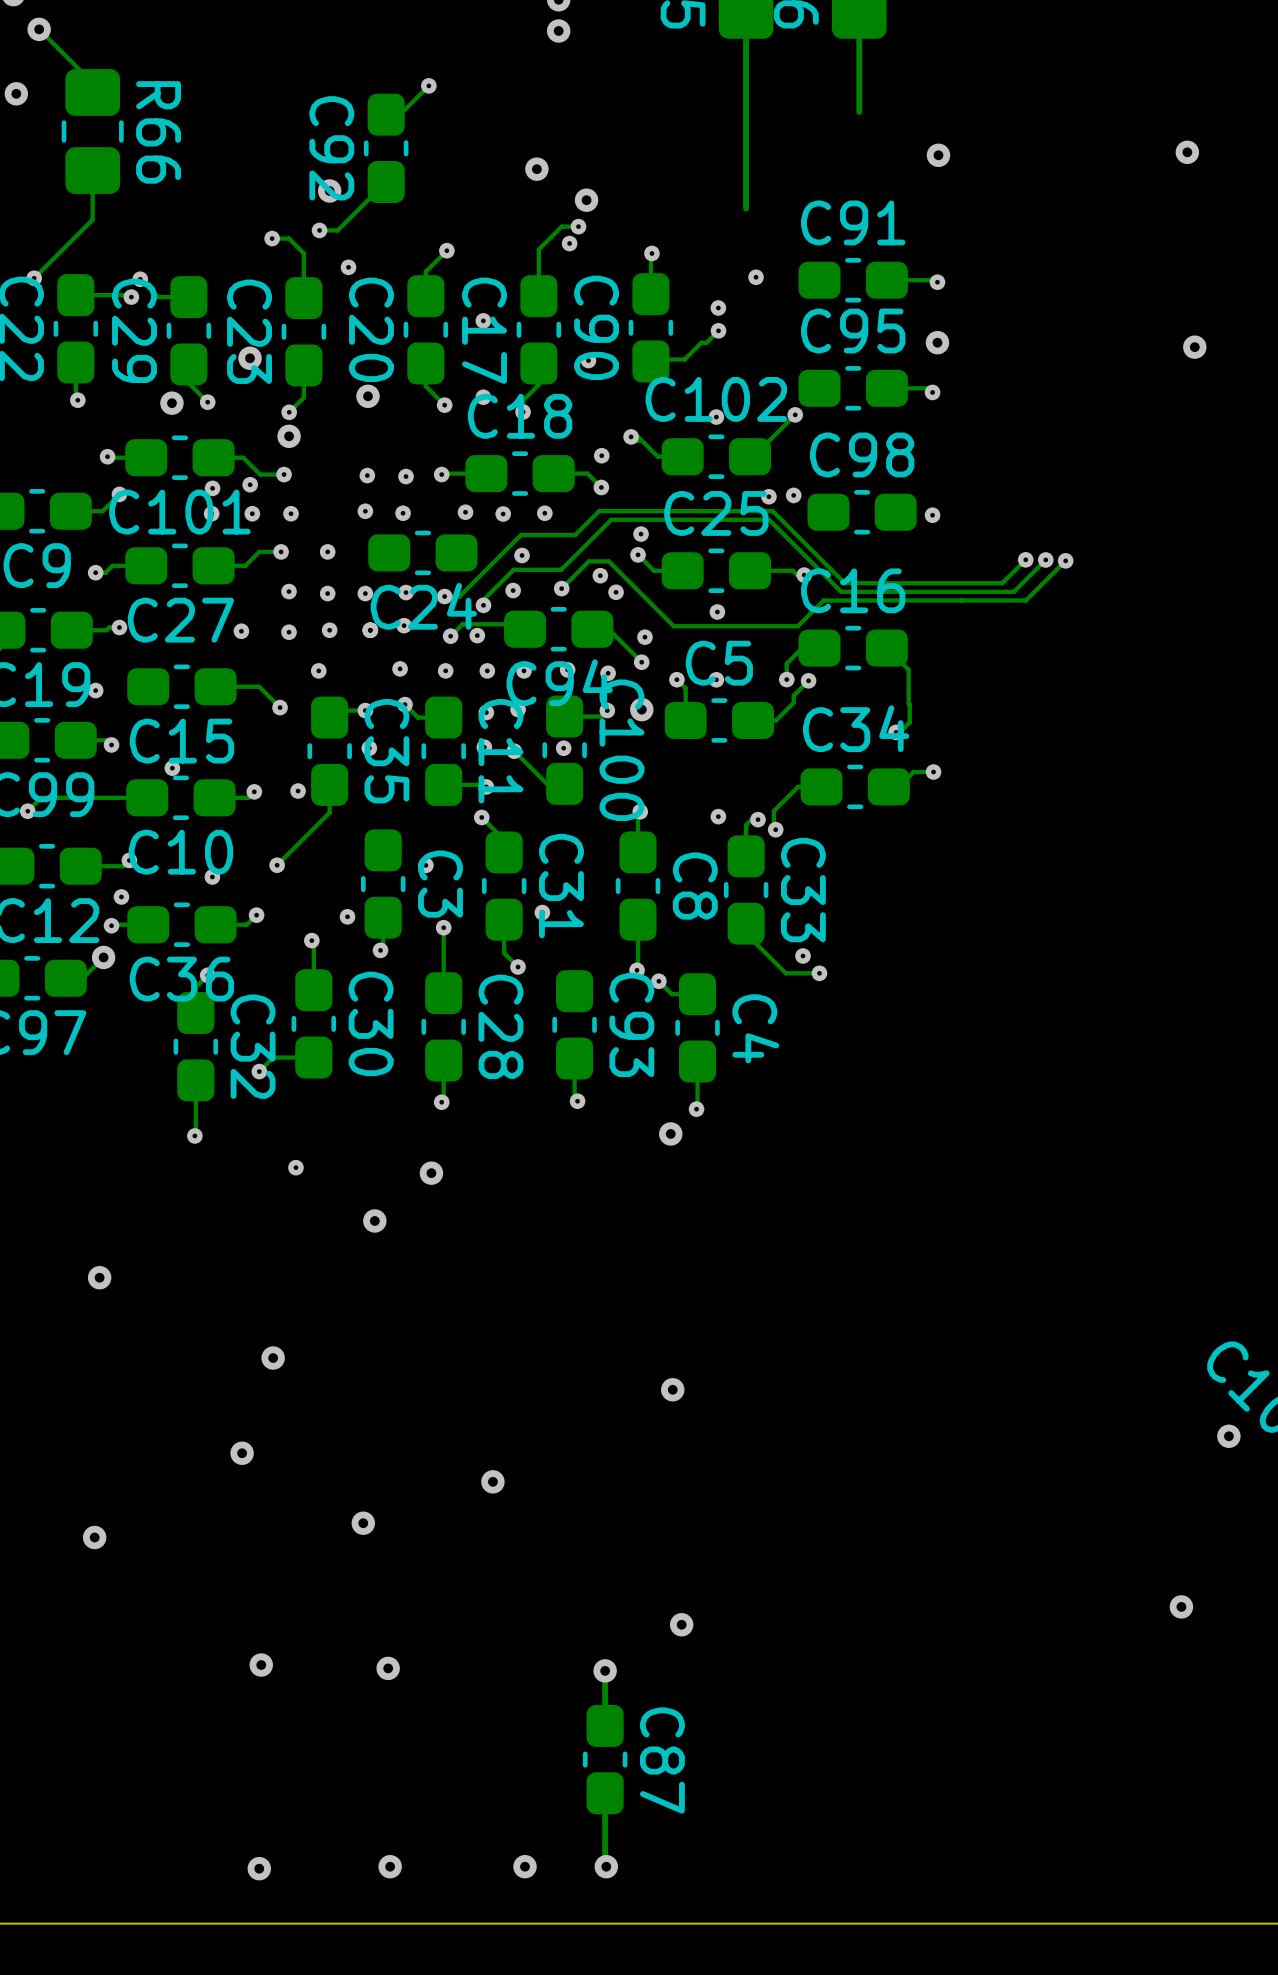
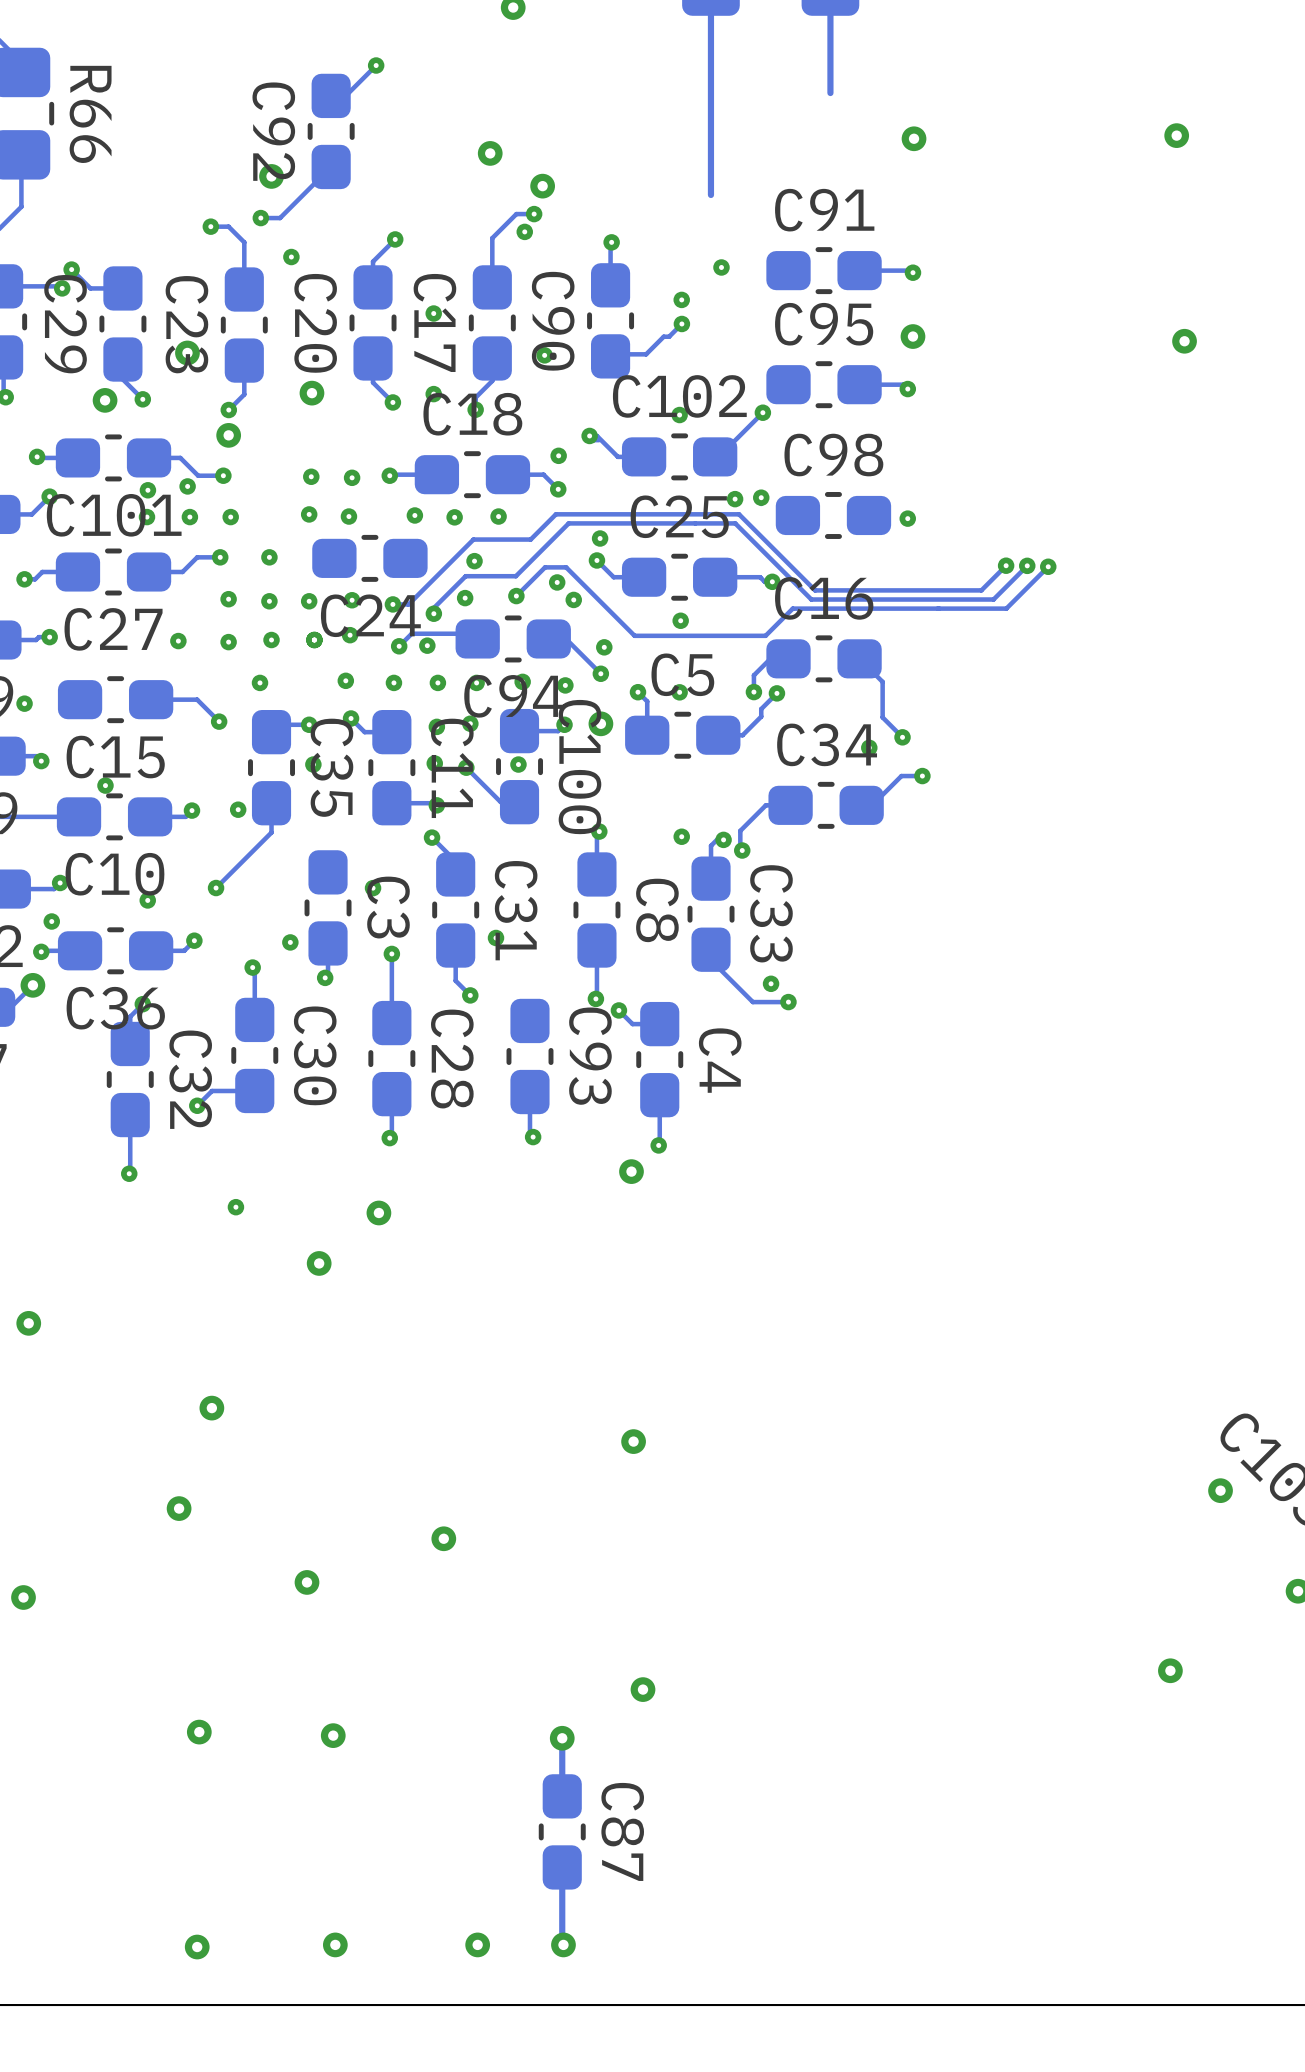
track: (909, 704) (909, 722) (899, 732) (896, 732) -> (883, 718) (902, 737)
via: none -> (902, 737)
track: (933, 772) (913, 772) -> (922, 776) (901, 776) (887, 789)
via position: (933, 772) -> (922, 776)

